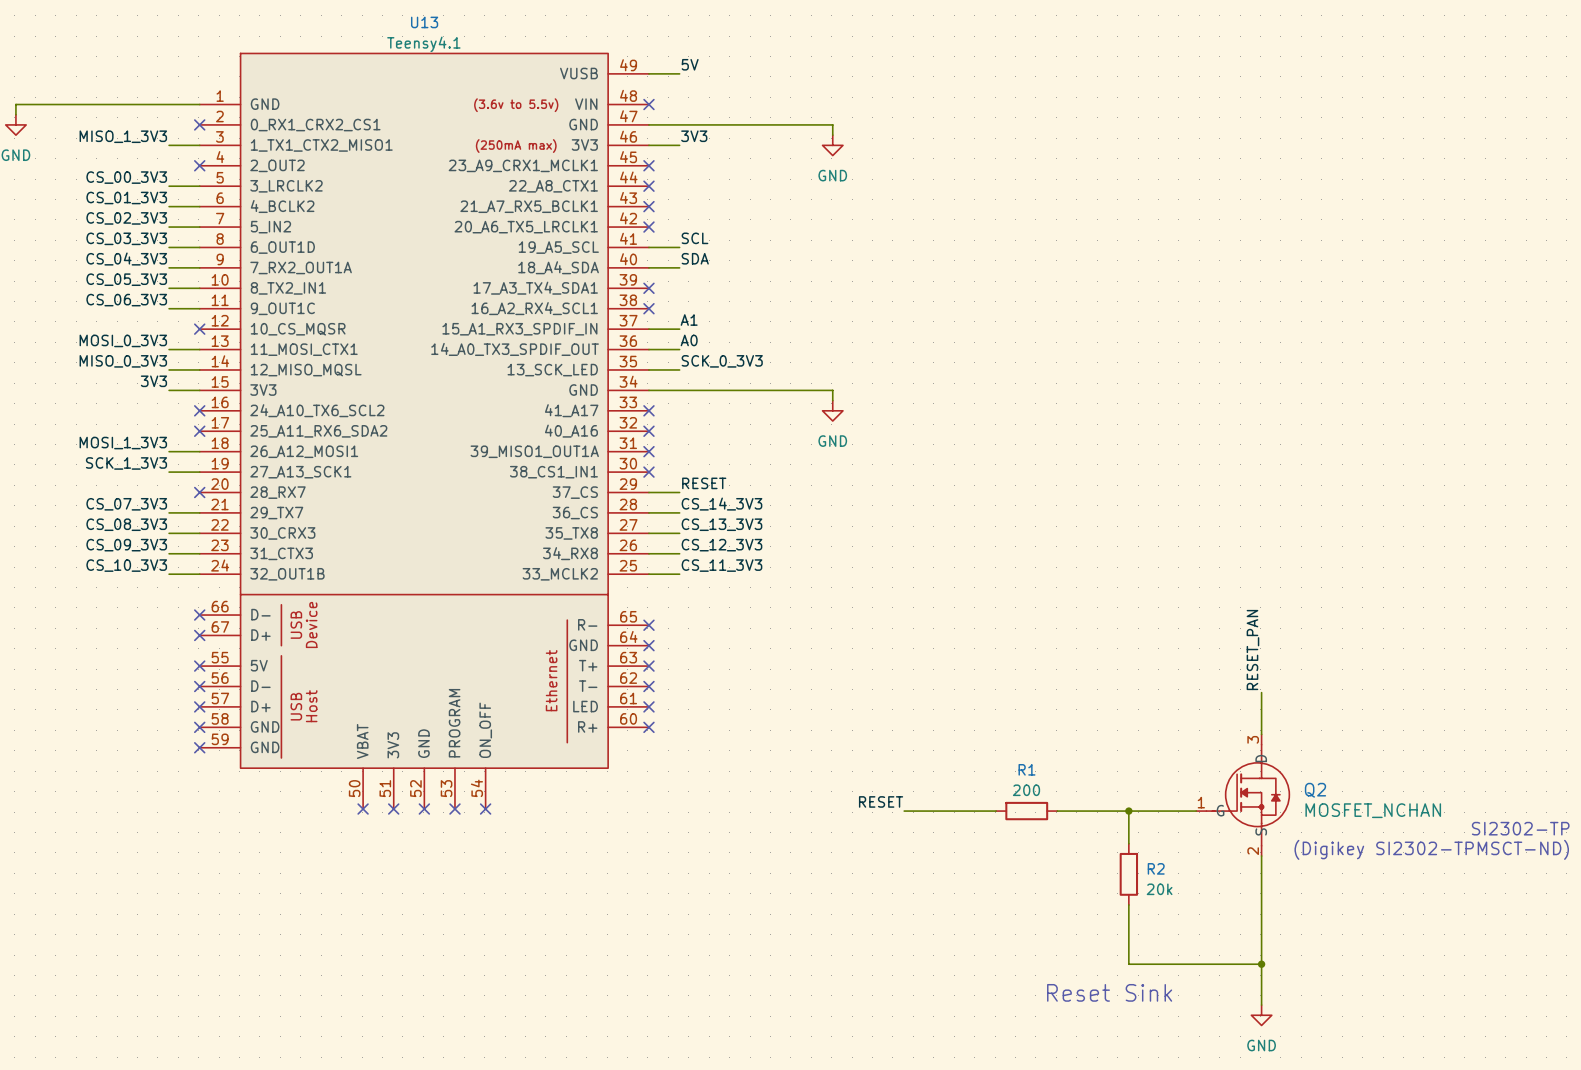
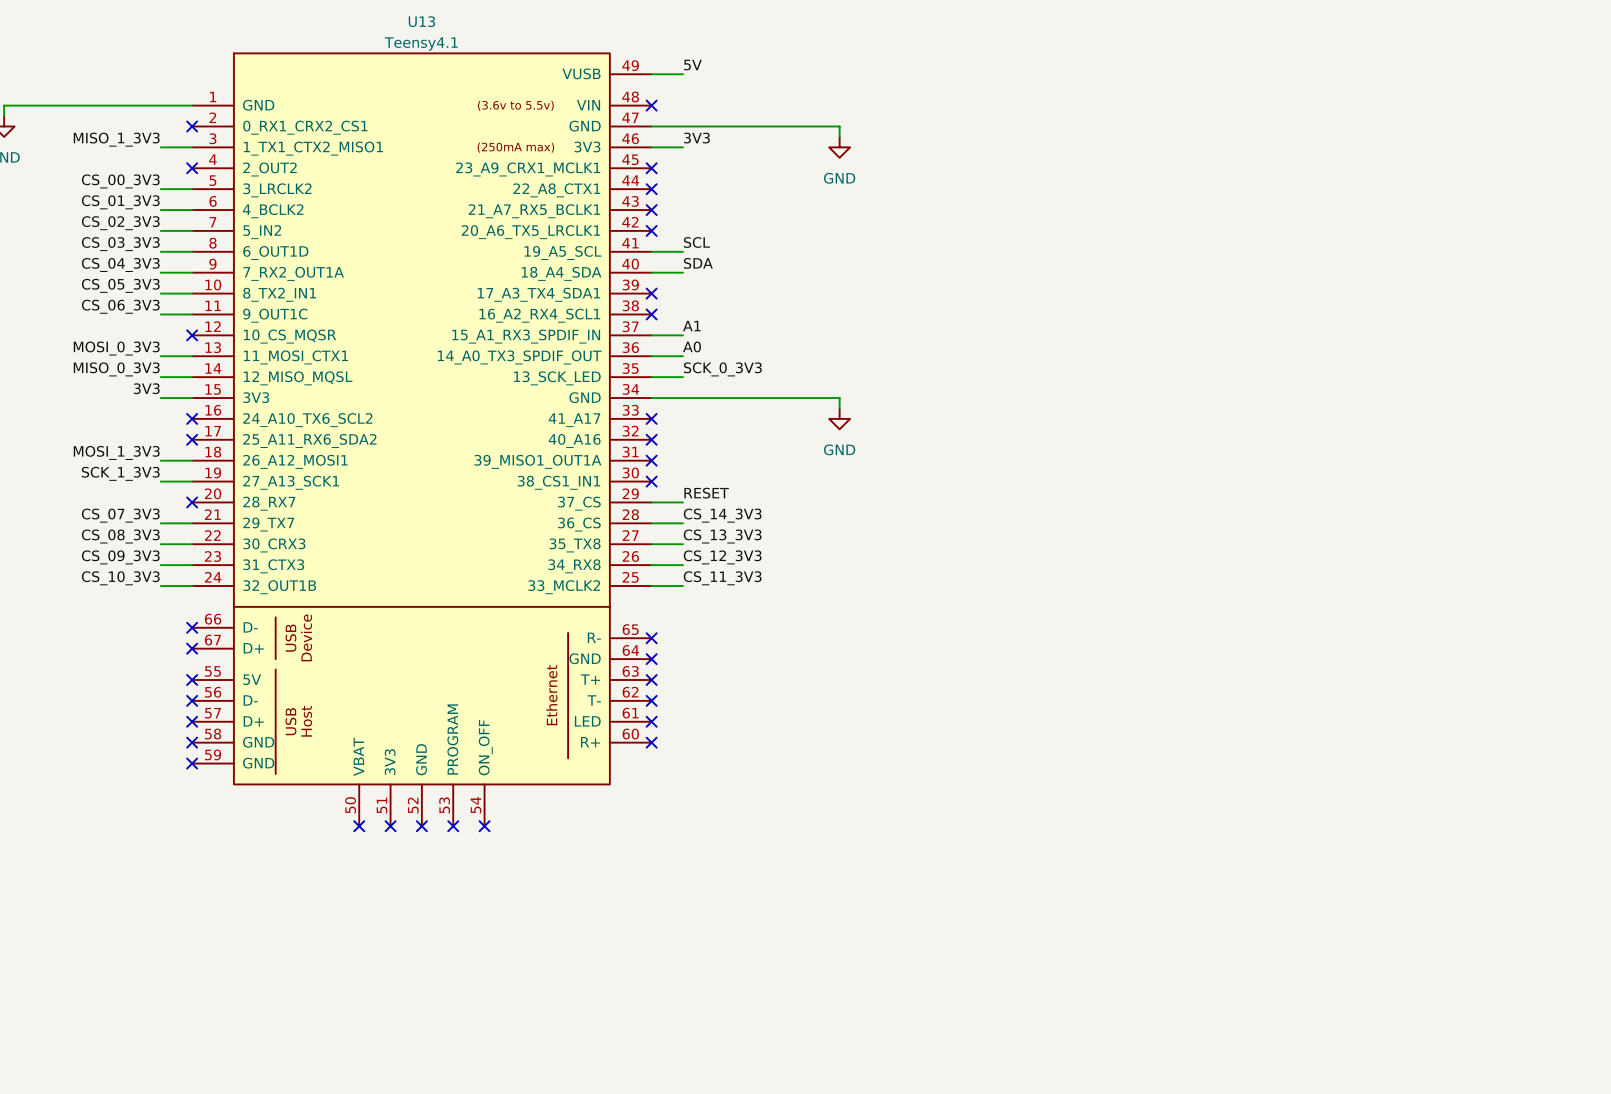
label: RESET_PAN (1252, 650) -> none
wire: (1261, 692) (1261, 734) -> none
Q2: MOSFET_NCHAN (1242, 795) -> none
label: RESET (881, 801) -> none
wire: (904, 811) (996, 811) -> none
R1: 200 (1026, 811) -> none
wire: (1057, 811) (1196, 811) -> none
wire: (1128, 811) (1128, 843) -> none
junction: (1128, 811) -> none
text: SI2302-TP (1520, 828) -> none
text: (Digikey SI2302-TPMSCT-ND) (1431, 849) -> none
wire: (1261, 855) (1261, 1005) -> none
R2: 20k (1128, 874) -> none
wire: (1128, 904) (1128, 964) (1261, 964) -> none
junction: (1261, 964) -> none
text: Reset Sink (1109, 992) -> none
power symbol: GND (1261, 1015) -> none

